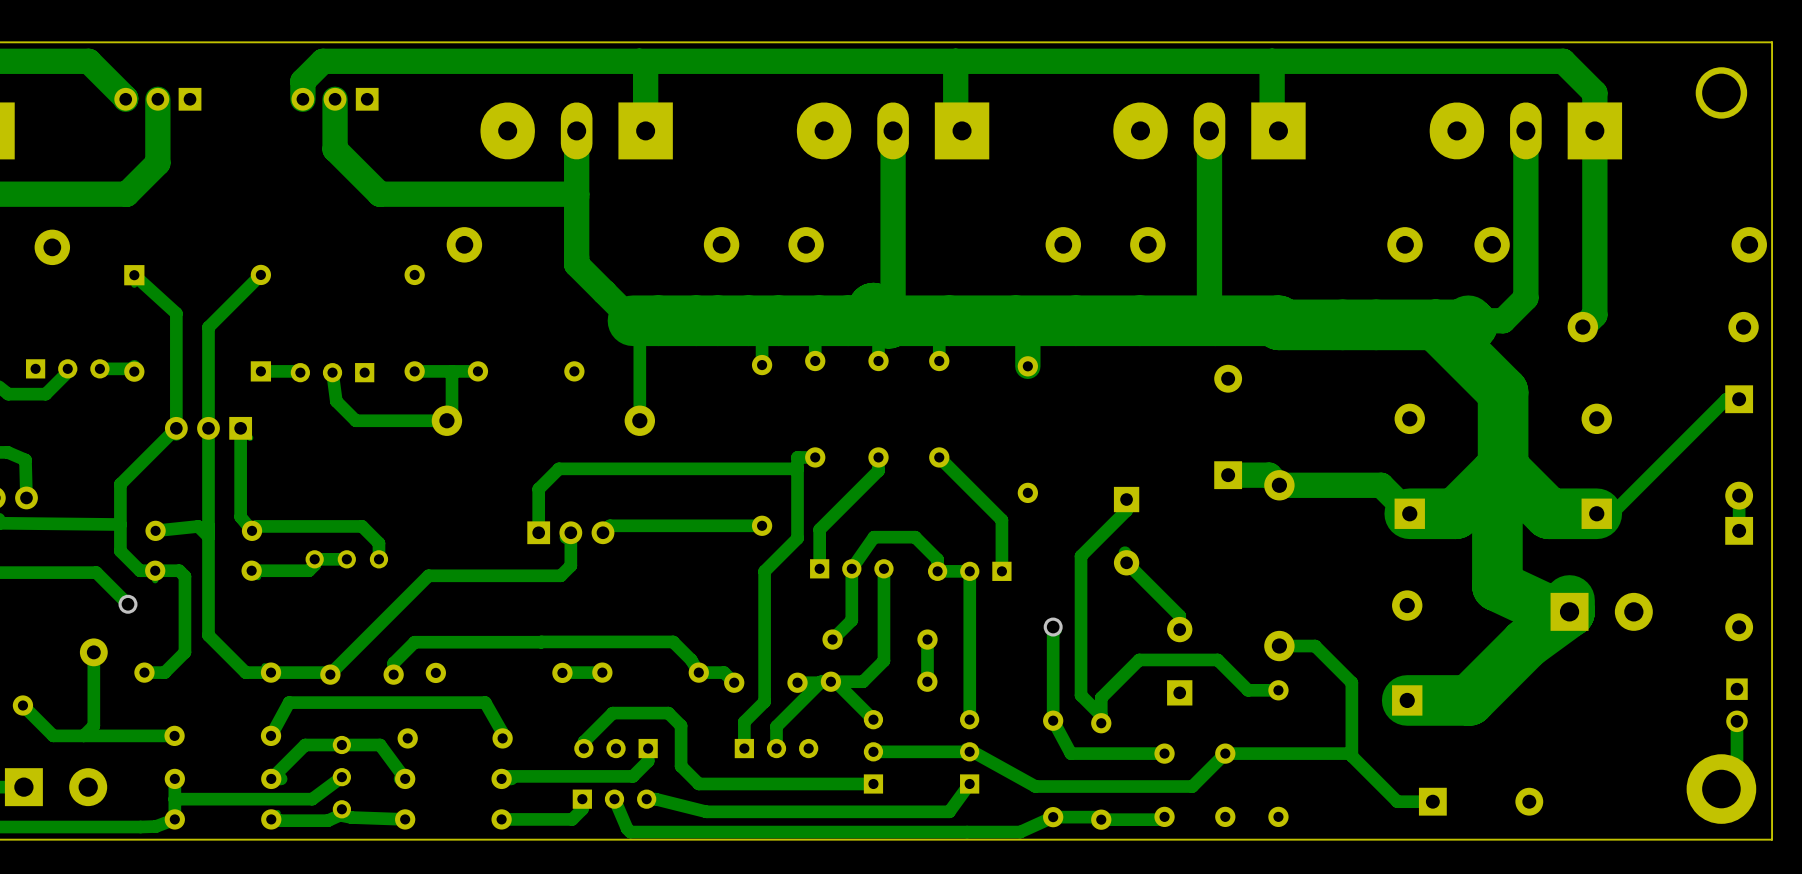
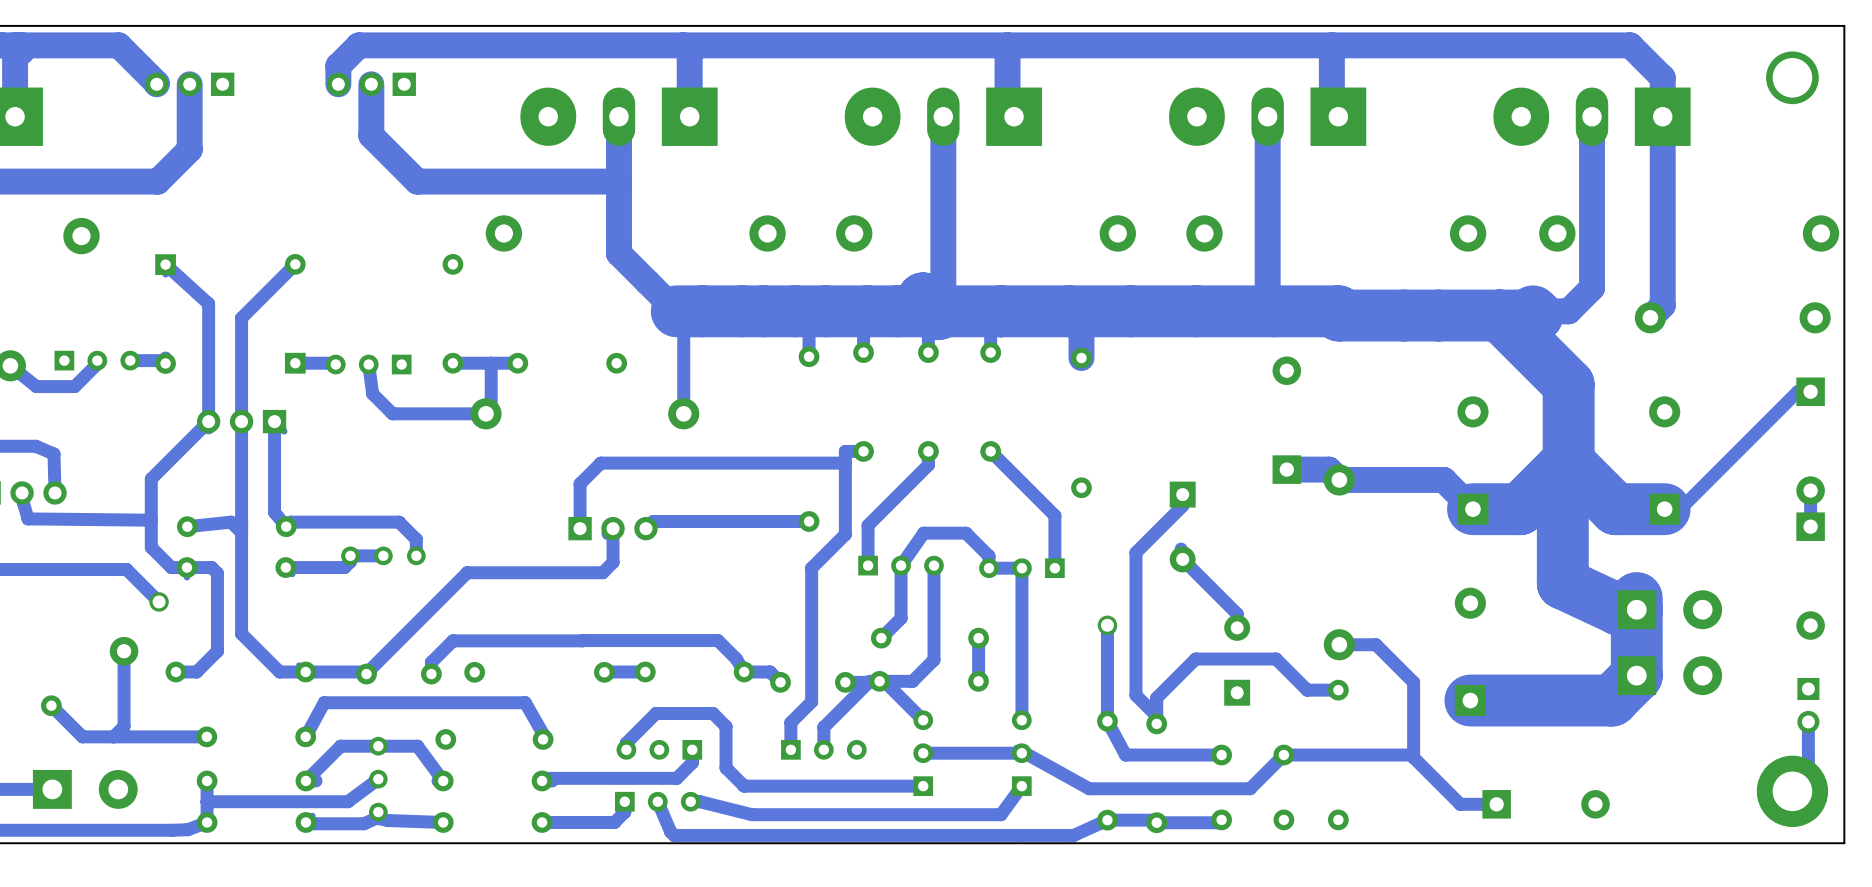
track: (1569, 611) (1526, 643) (1469, 700) -> (1636, 609) (1636, 675) (1611, 700) (1533, 700)
part: (1601, 611) -> none
part: none -> (1669, 642)

